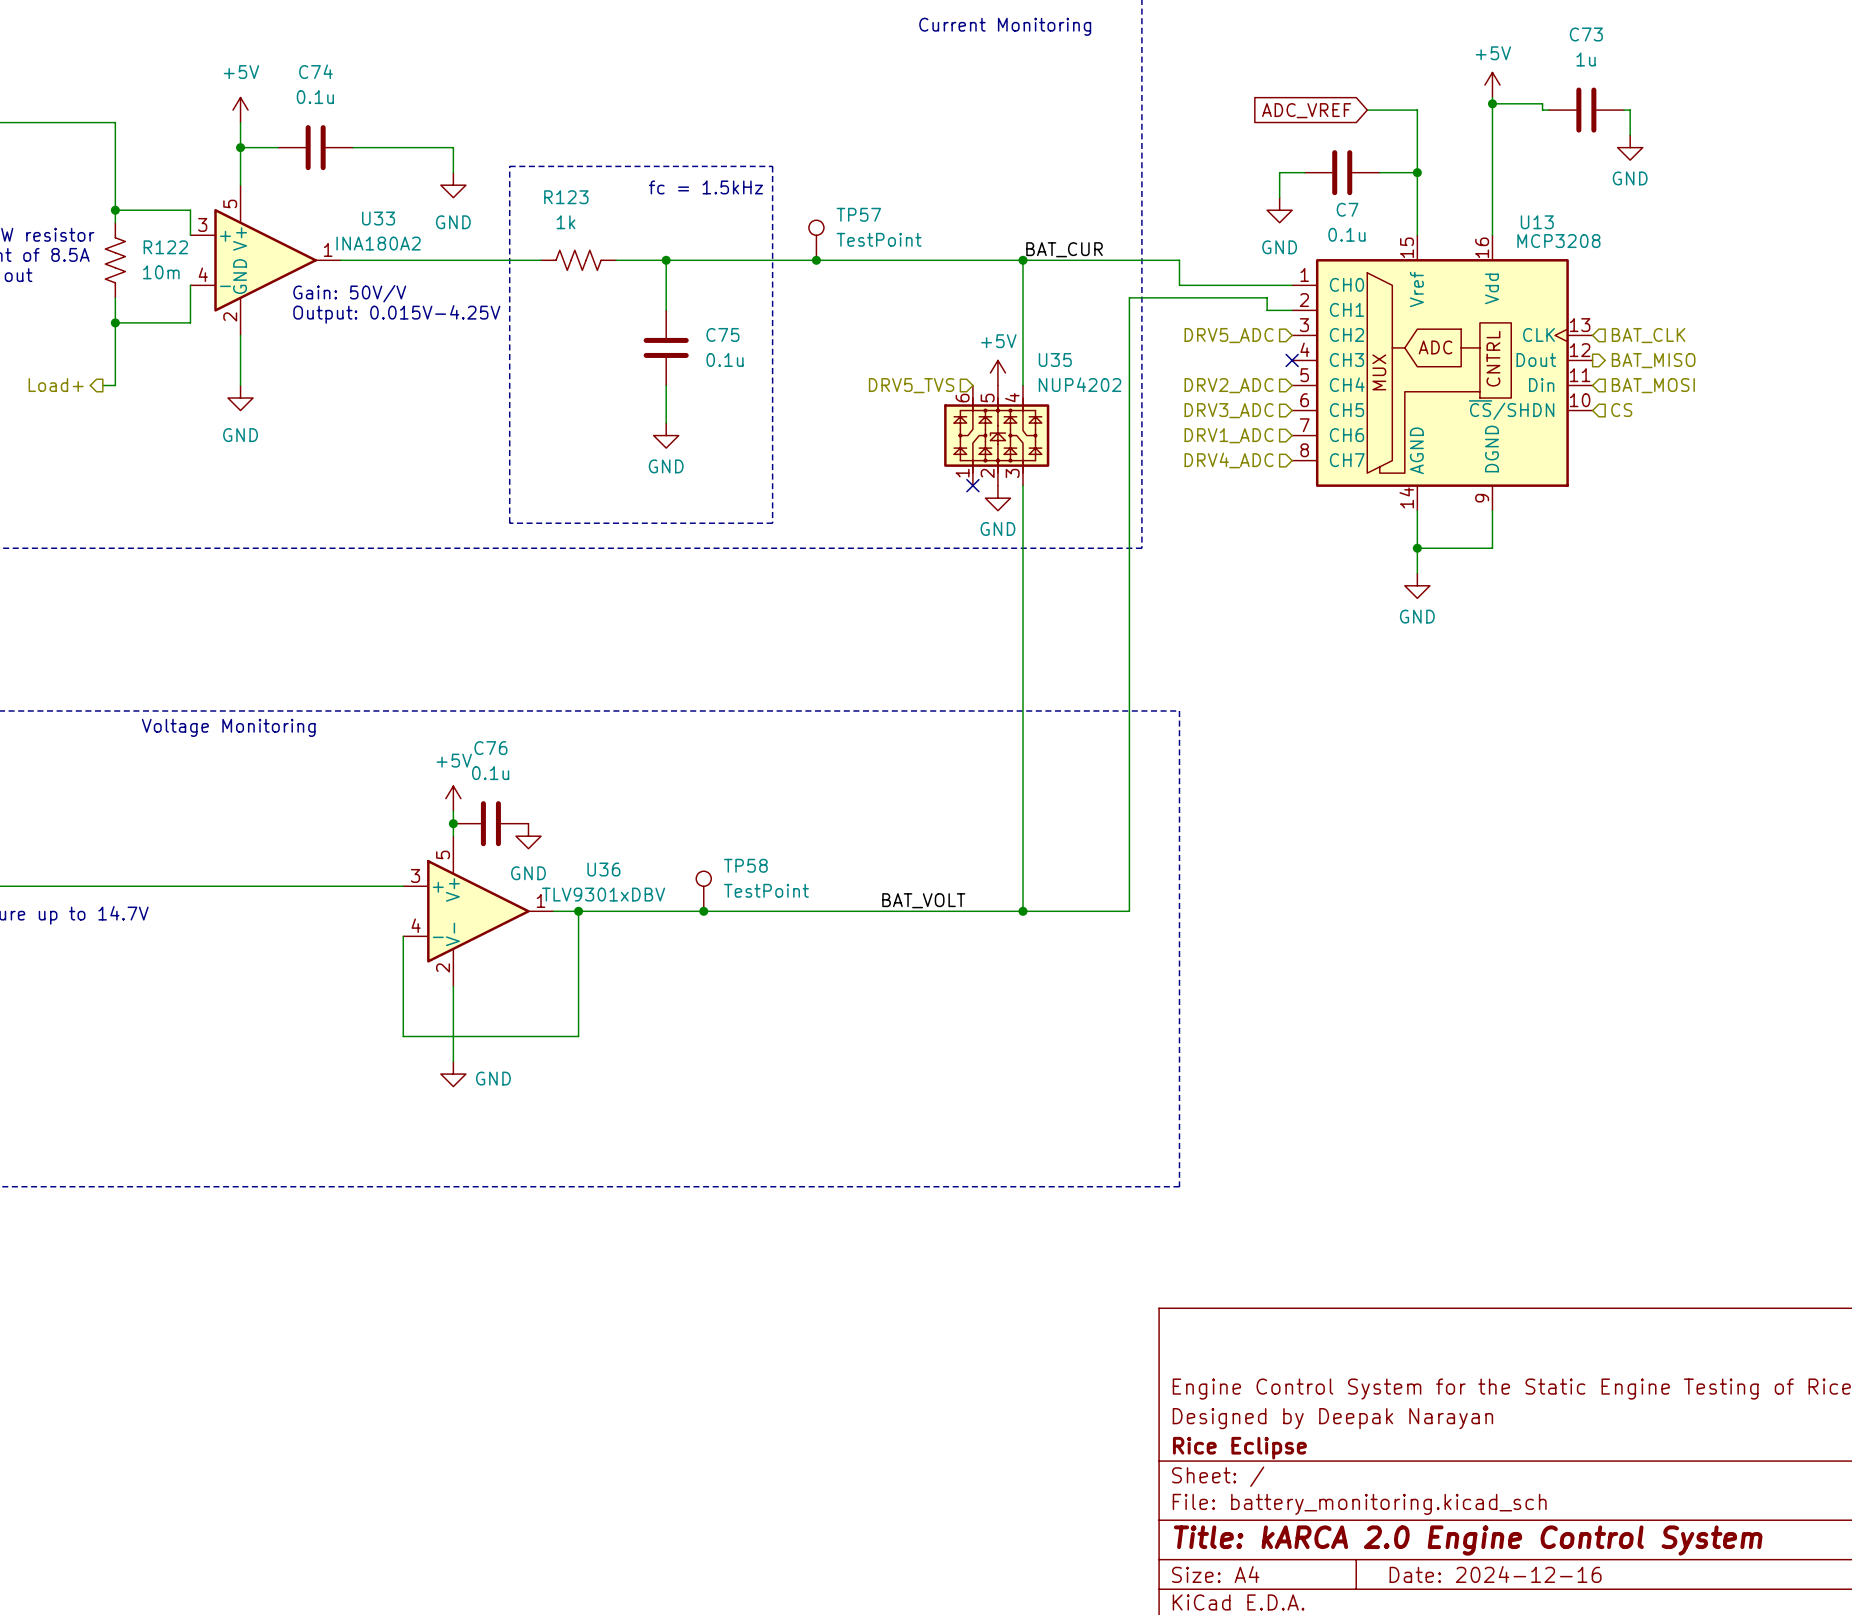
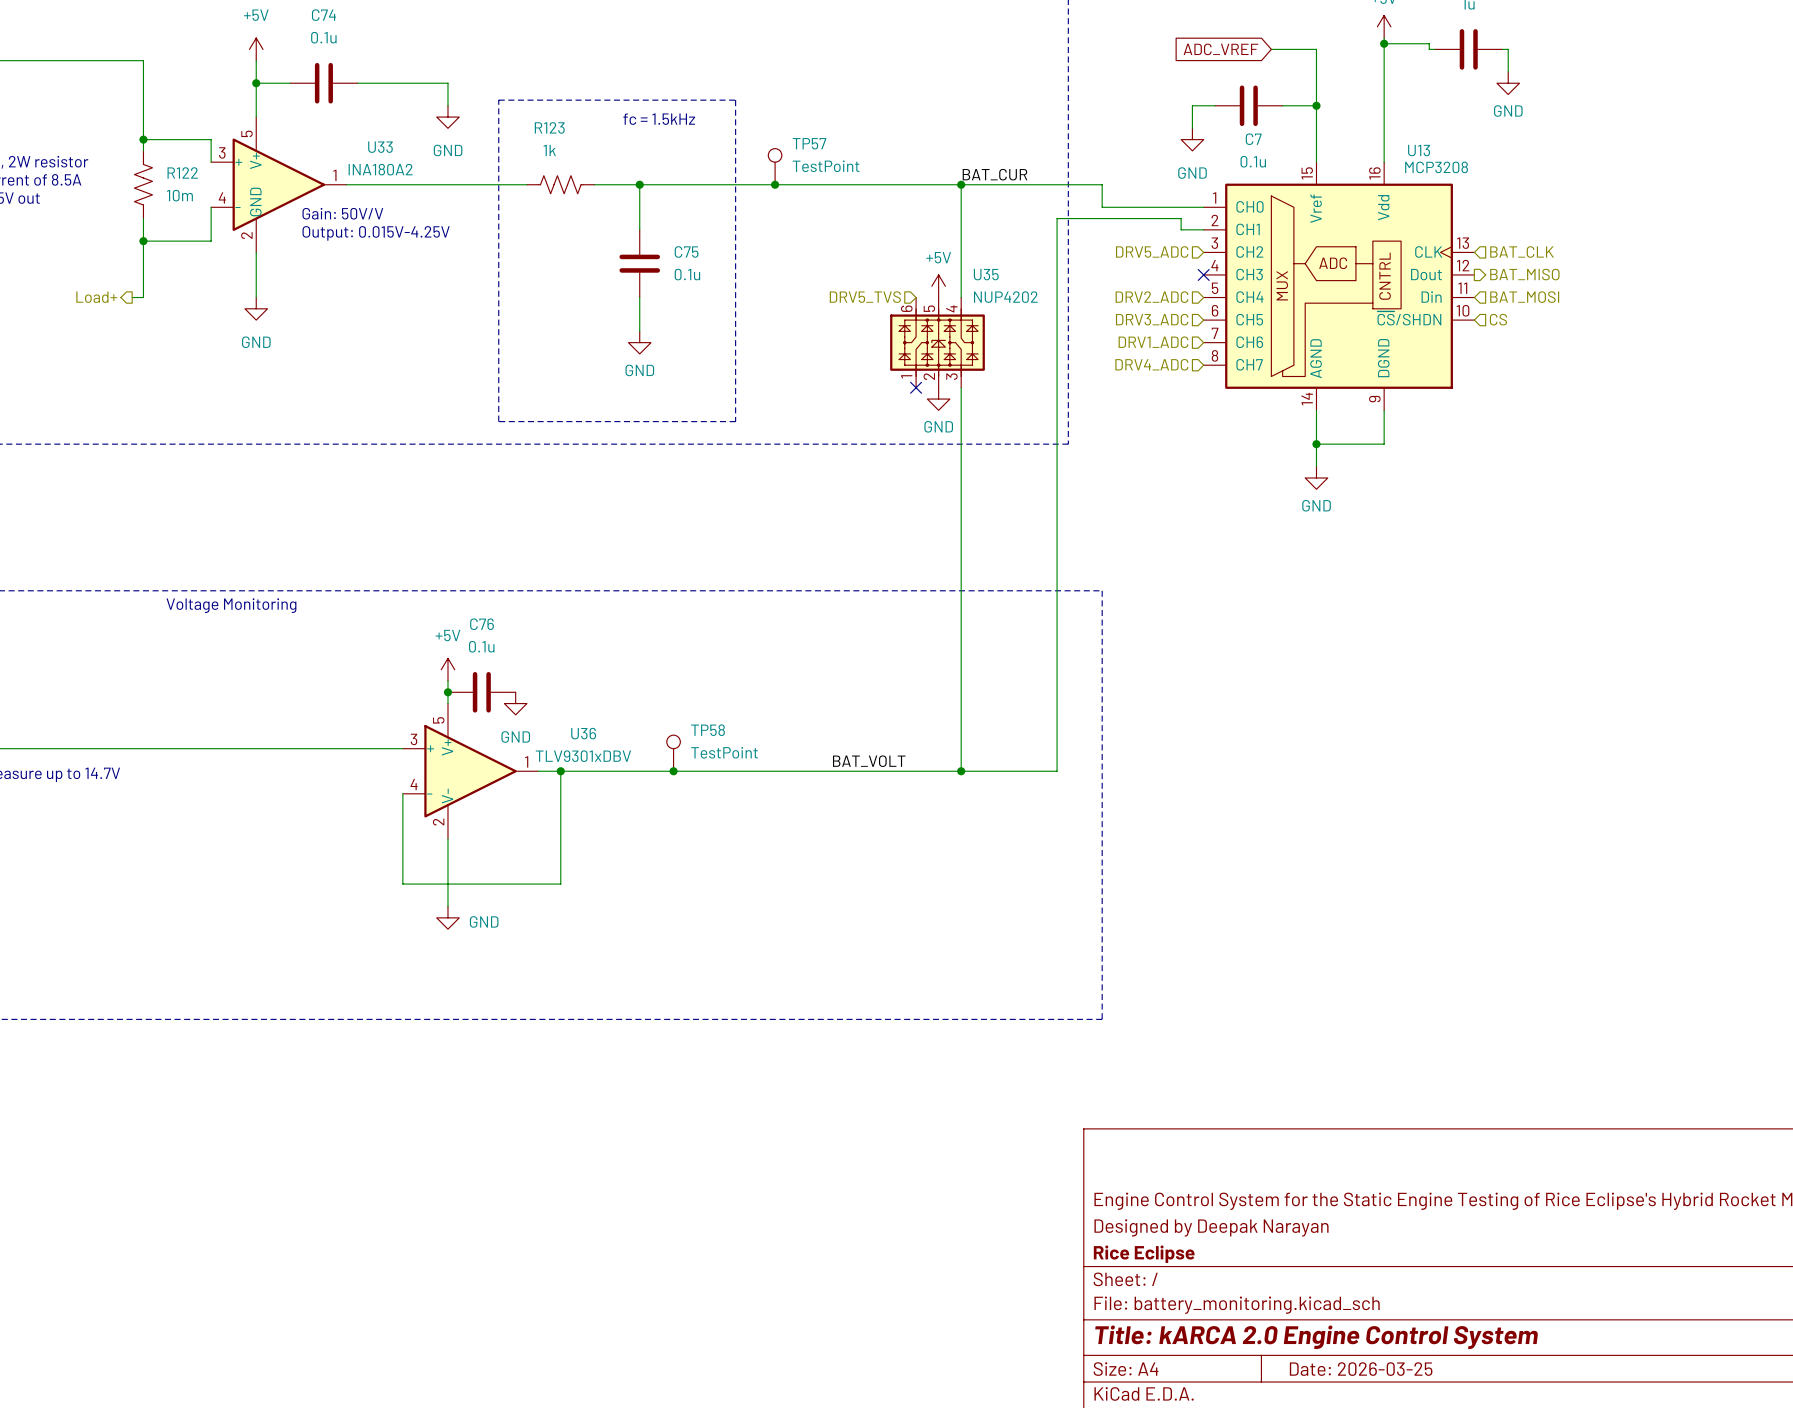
title block: Date: 2024-12-16 (1495, 1574) -> Date: 2026-03-25 (1361, 1369)

